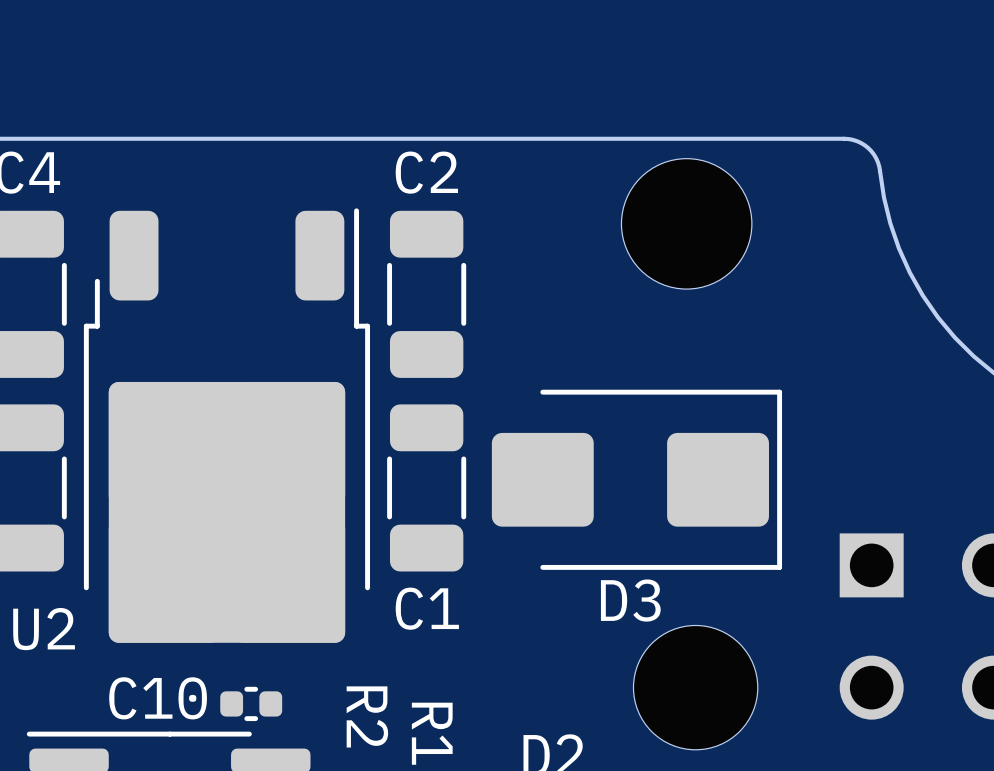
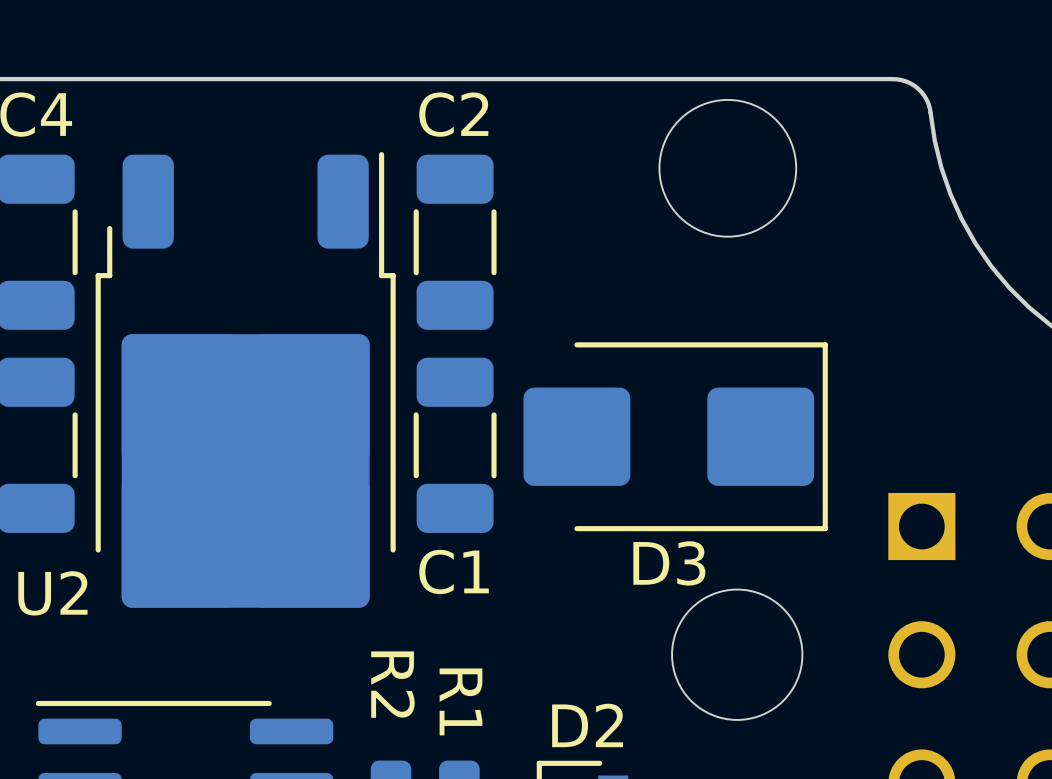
C10: (251, 703) -> none

